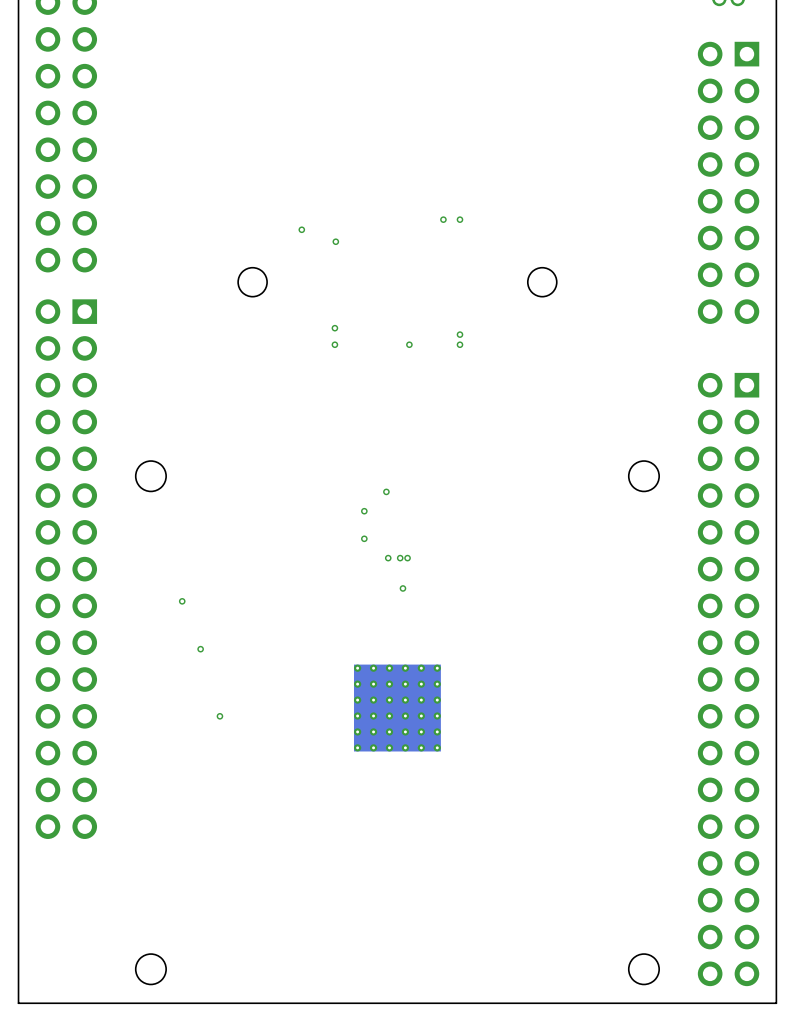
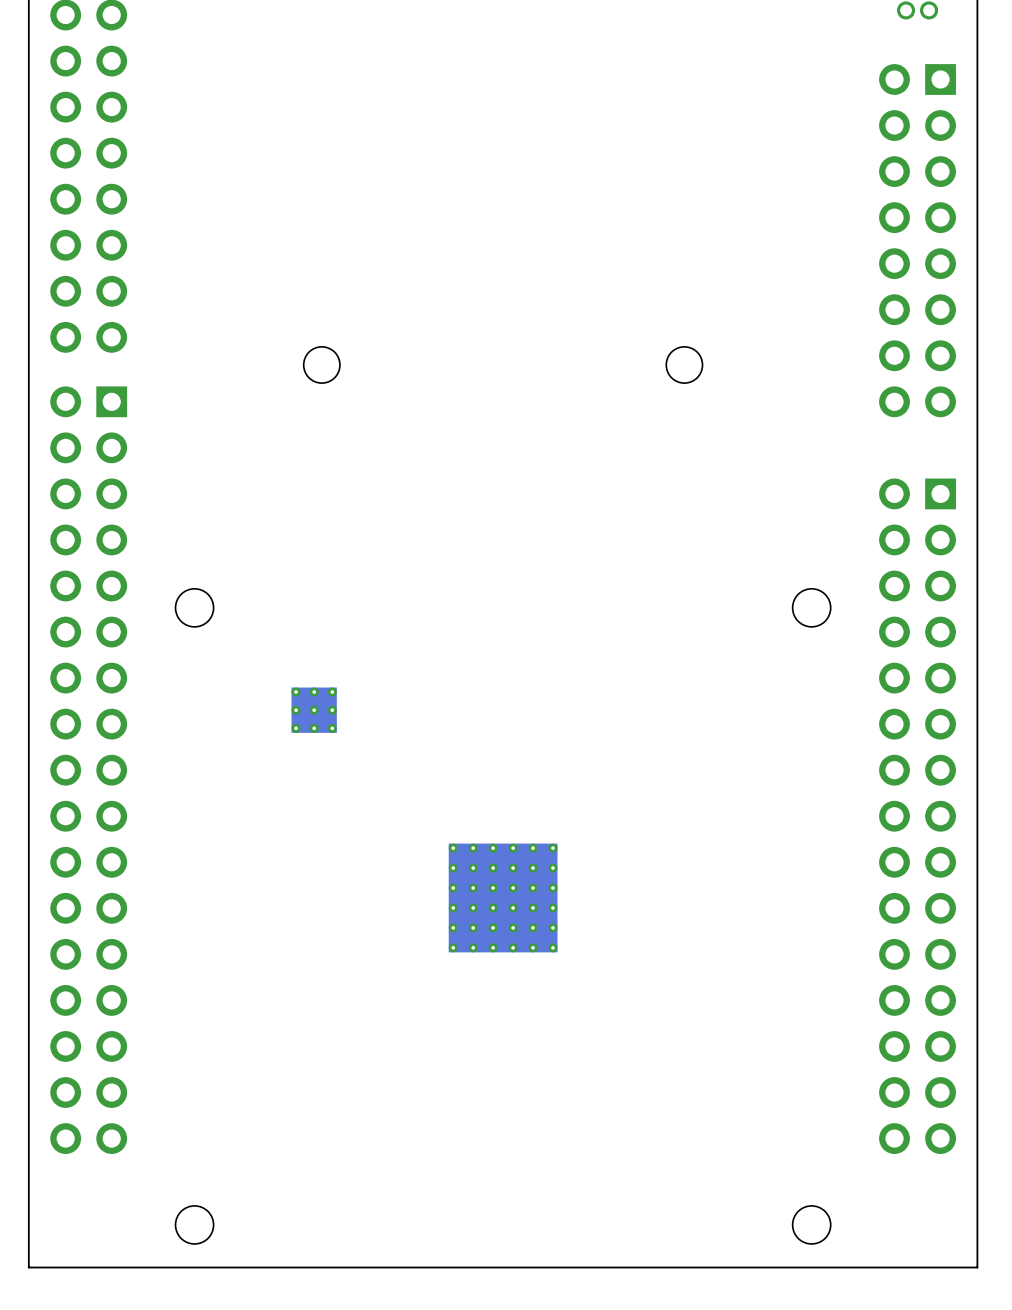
via: (443, 219) -> none
via: (459, 219) -> none
via: (301, 229) -> none
via: (335, 241) -> none
via: (334, 328) -> none
via: (459, 334) -> none
via: (334, 344) -> none
via: (409, 344) -> none
via: (459, 344) -> none
via: (386, 491) -> none
via: (364, 511) -> none
via: (364, 538) -> none
part: none -> (314, 710)
via: (388, 558) -> none
via: (400, 558) -> none
via: (407, 558) -> none
via: (402, 588) -> none
via: (182, 601) -> none
part: none -> (88, 770)
via: (200, 649) -> none
part: (728, 679) -> none
via: (219, 716) -> none

